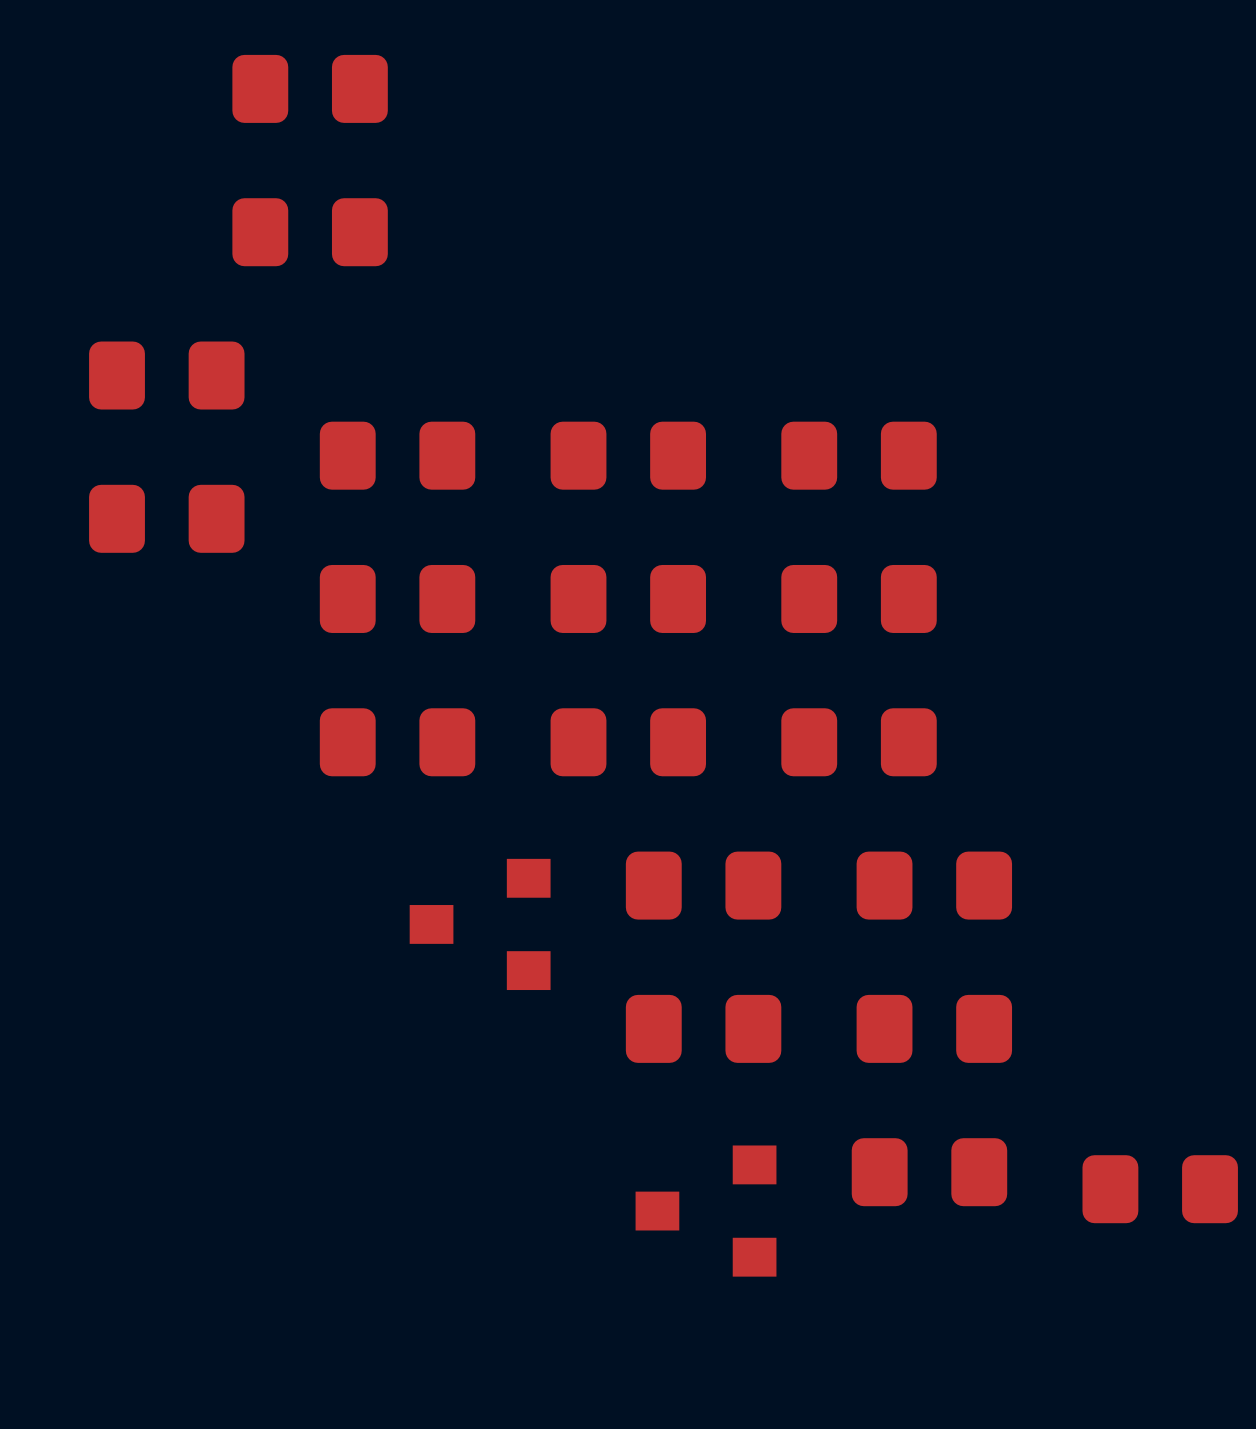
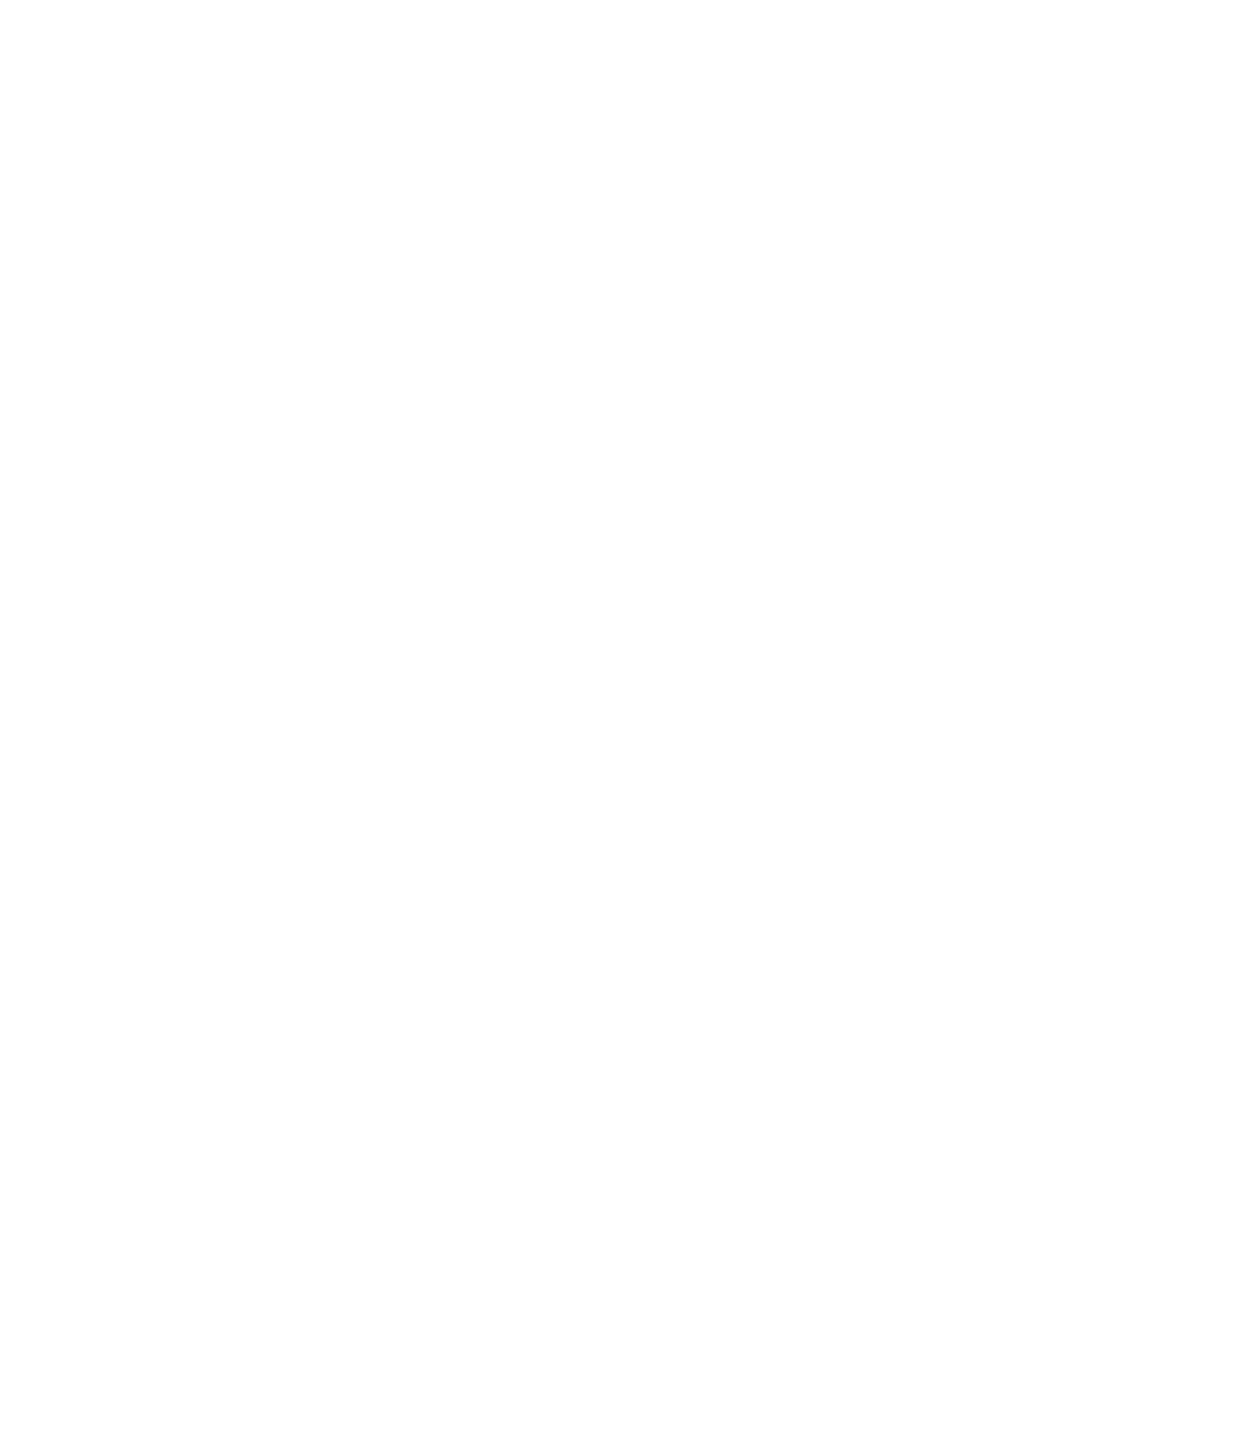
part: (310, 88) -> none
part: (310, 232) -> none
part: (166, 375) -> none
part: (397, 455) -> none
part: (628, 455) -> none
part: (859, 455) -> none
part: (166, 518) -> none
part: (397, 598) -> none
part: (628, 598) -> none
part: (859, 598) -> none
part: (397, 742) -> none
part: (628, 742) -> none
part: (859, 742) -> none
part: (703, 885) -> none
part: (934, 885) -> none
part: (480, 924) -> none
part: (703, 1028) -> none
part: (934, 1028) -> none
part: (929, 1172) -> none
part: (1160, 1189) -> none
part: (706, 1211) -> none

